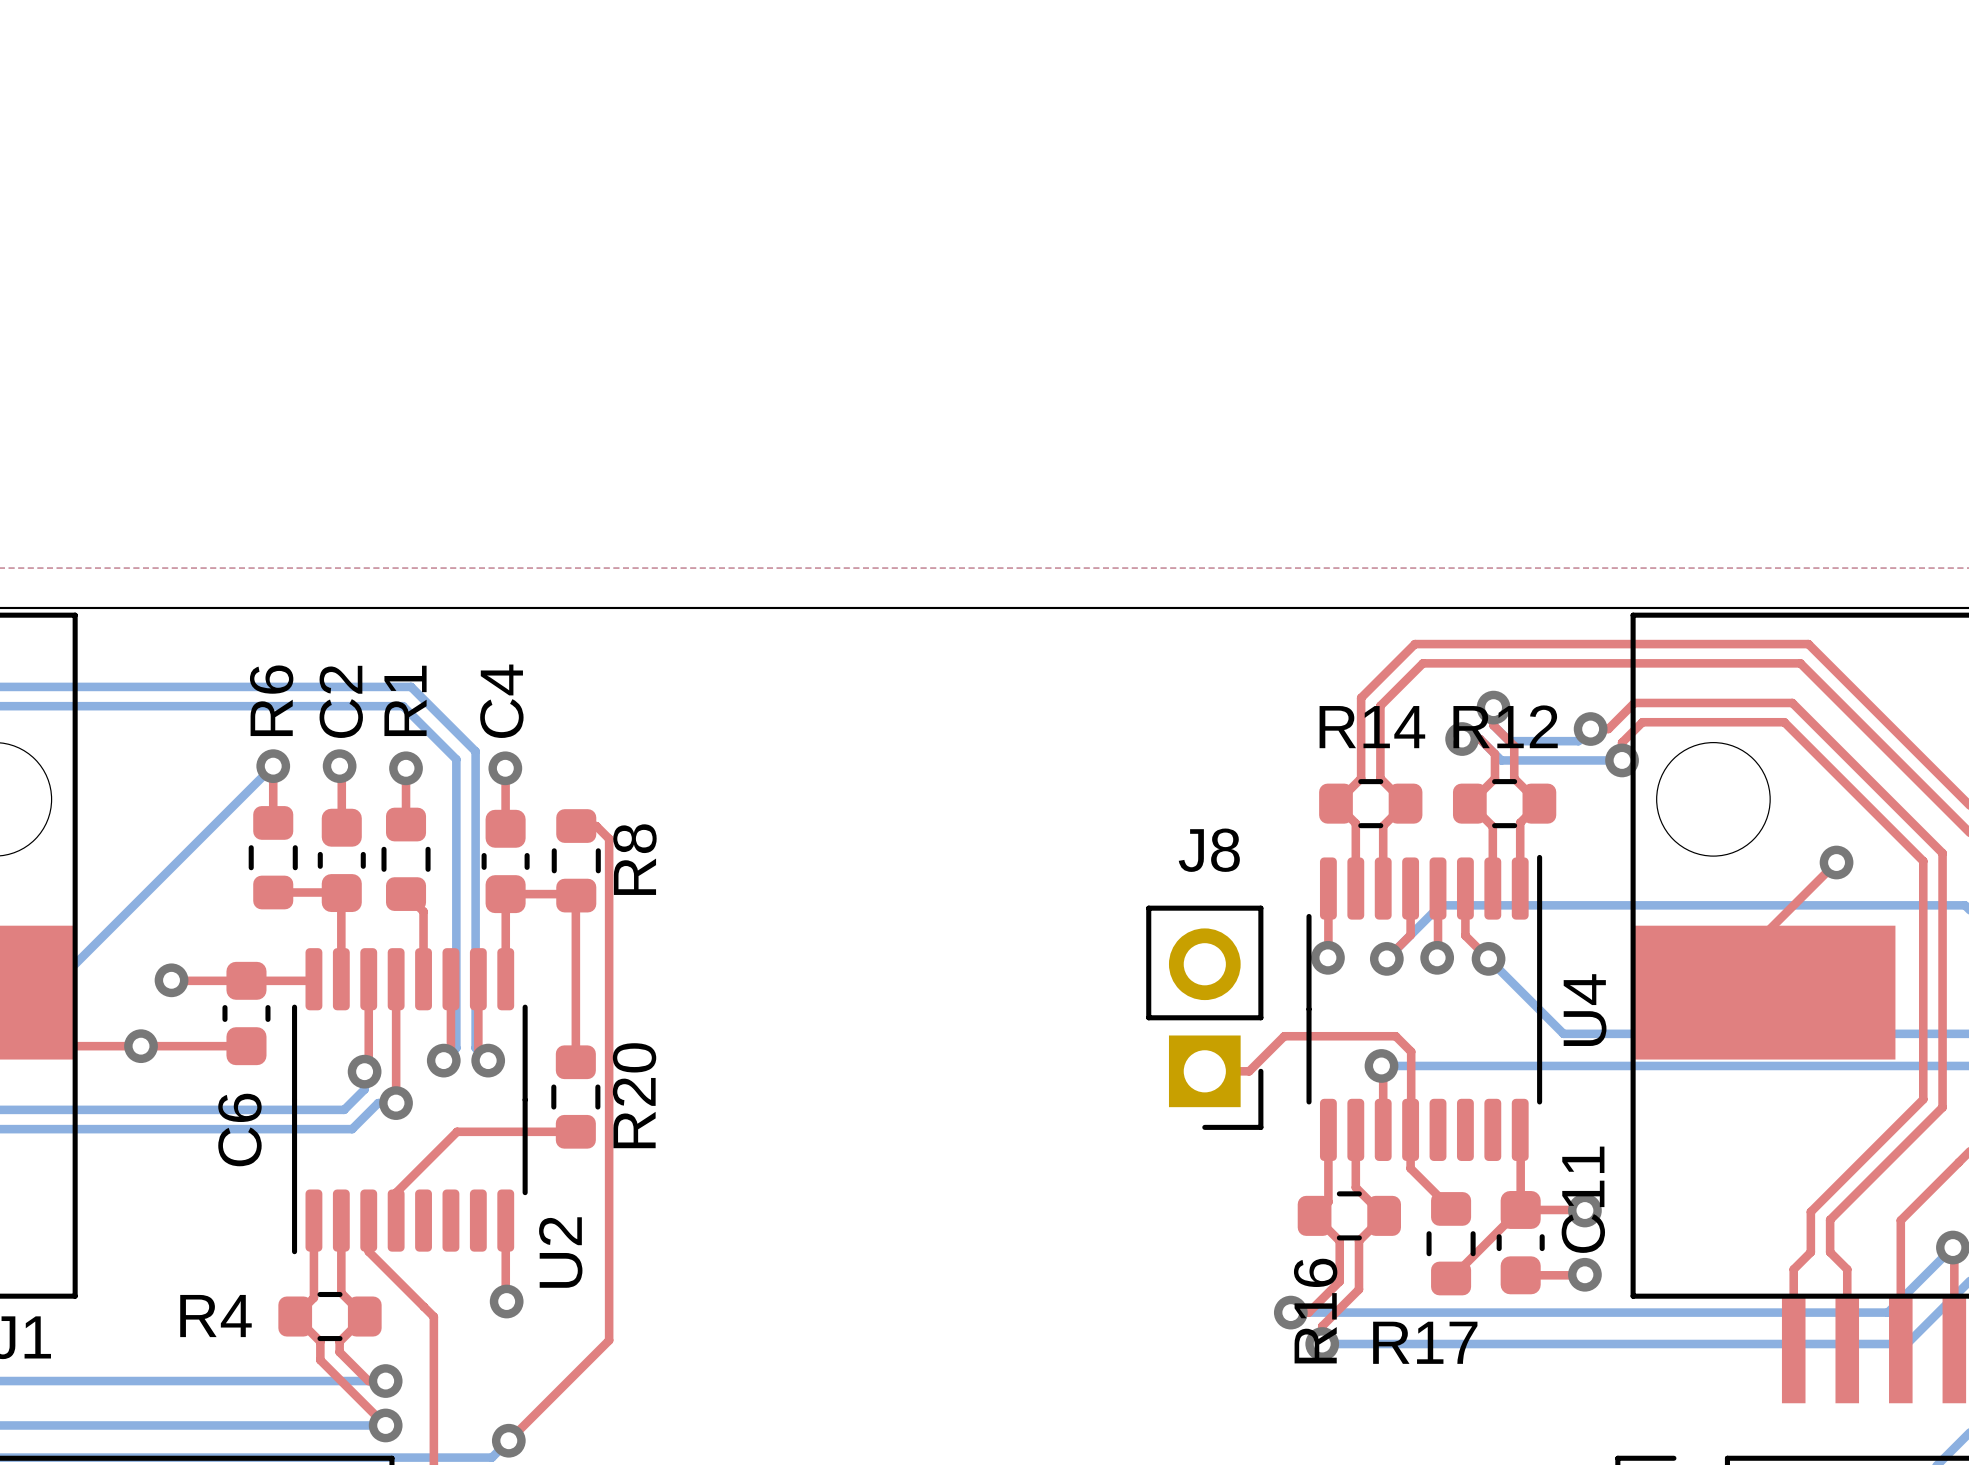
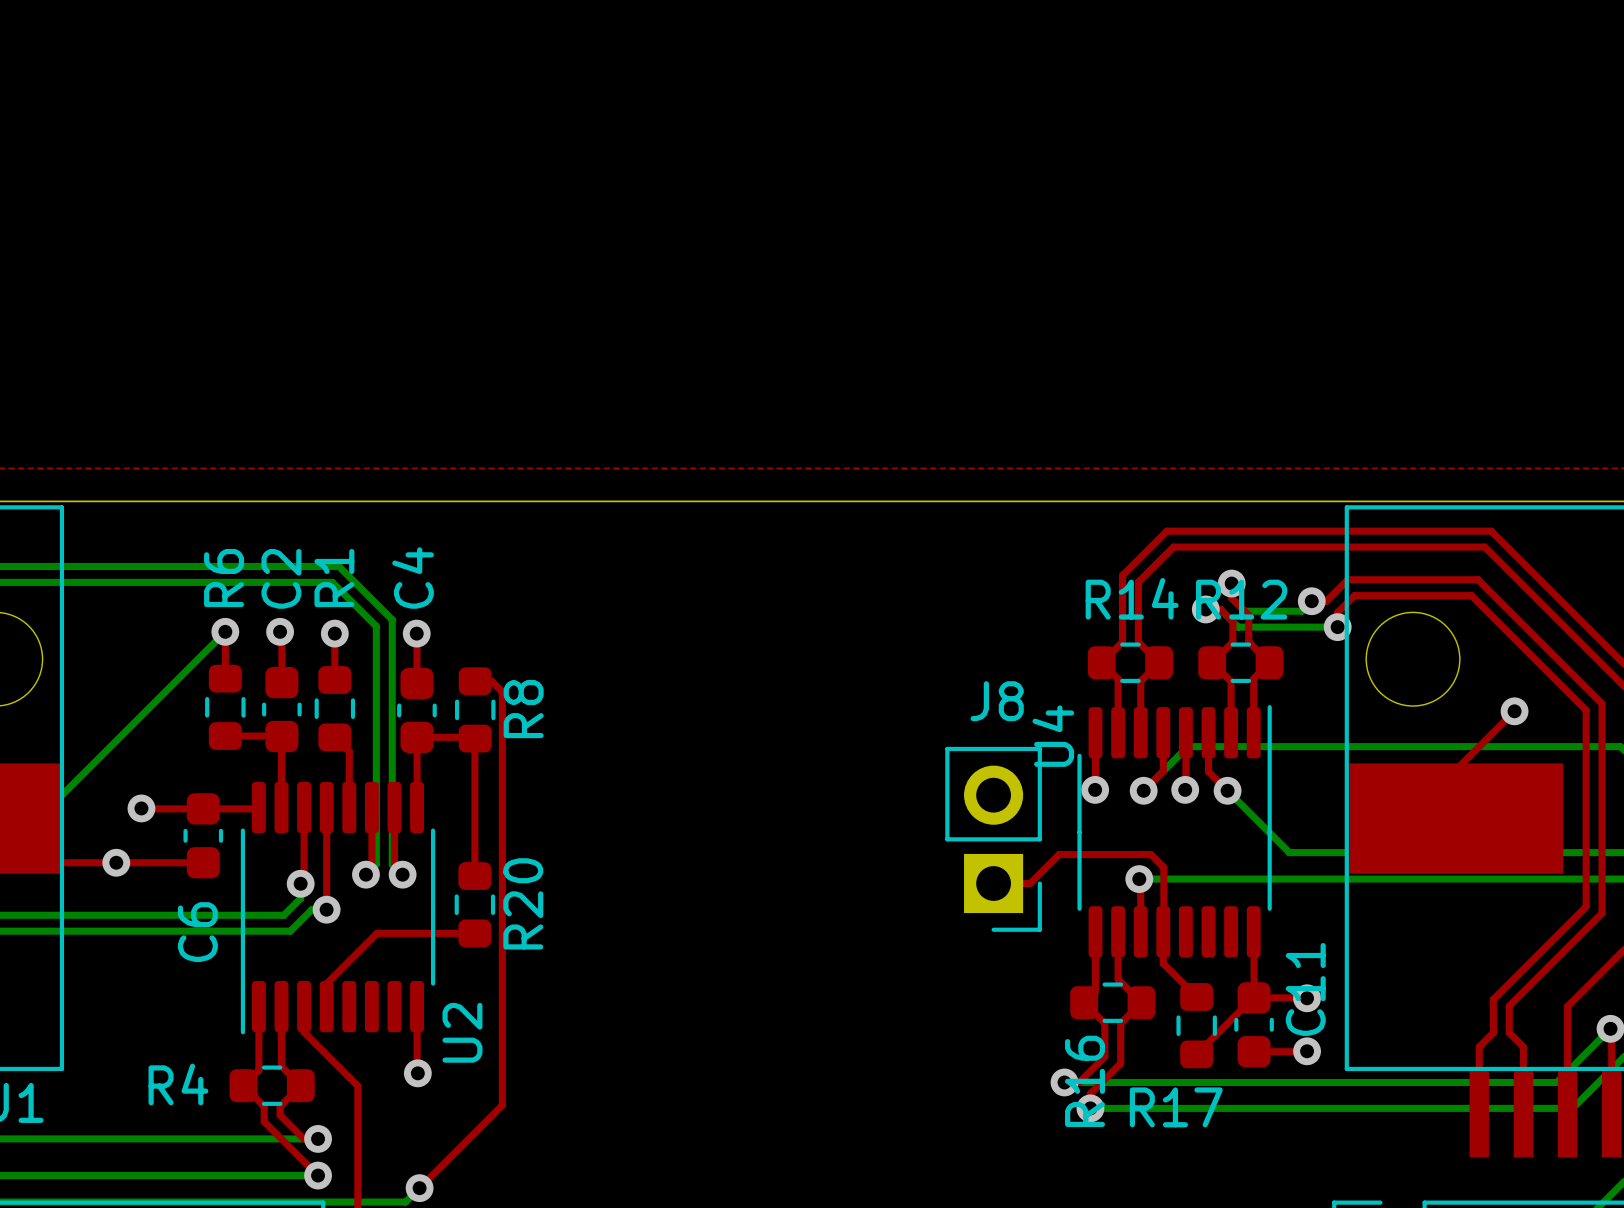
U4 name position: U4 (1585, 1010) -> U4 (1053, 736)

